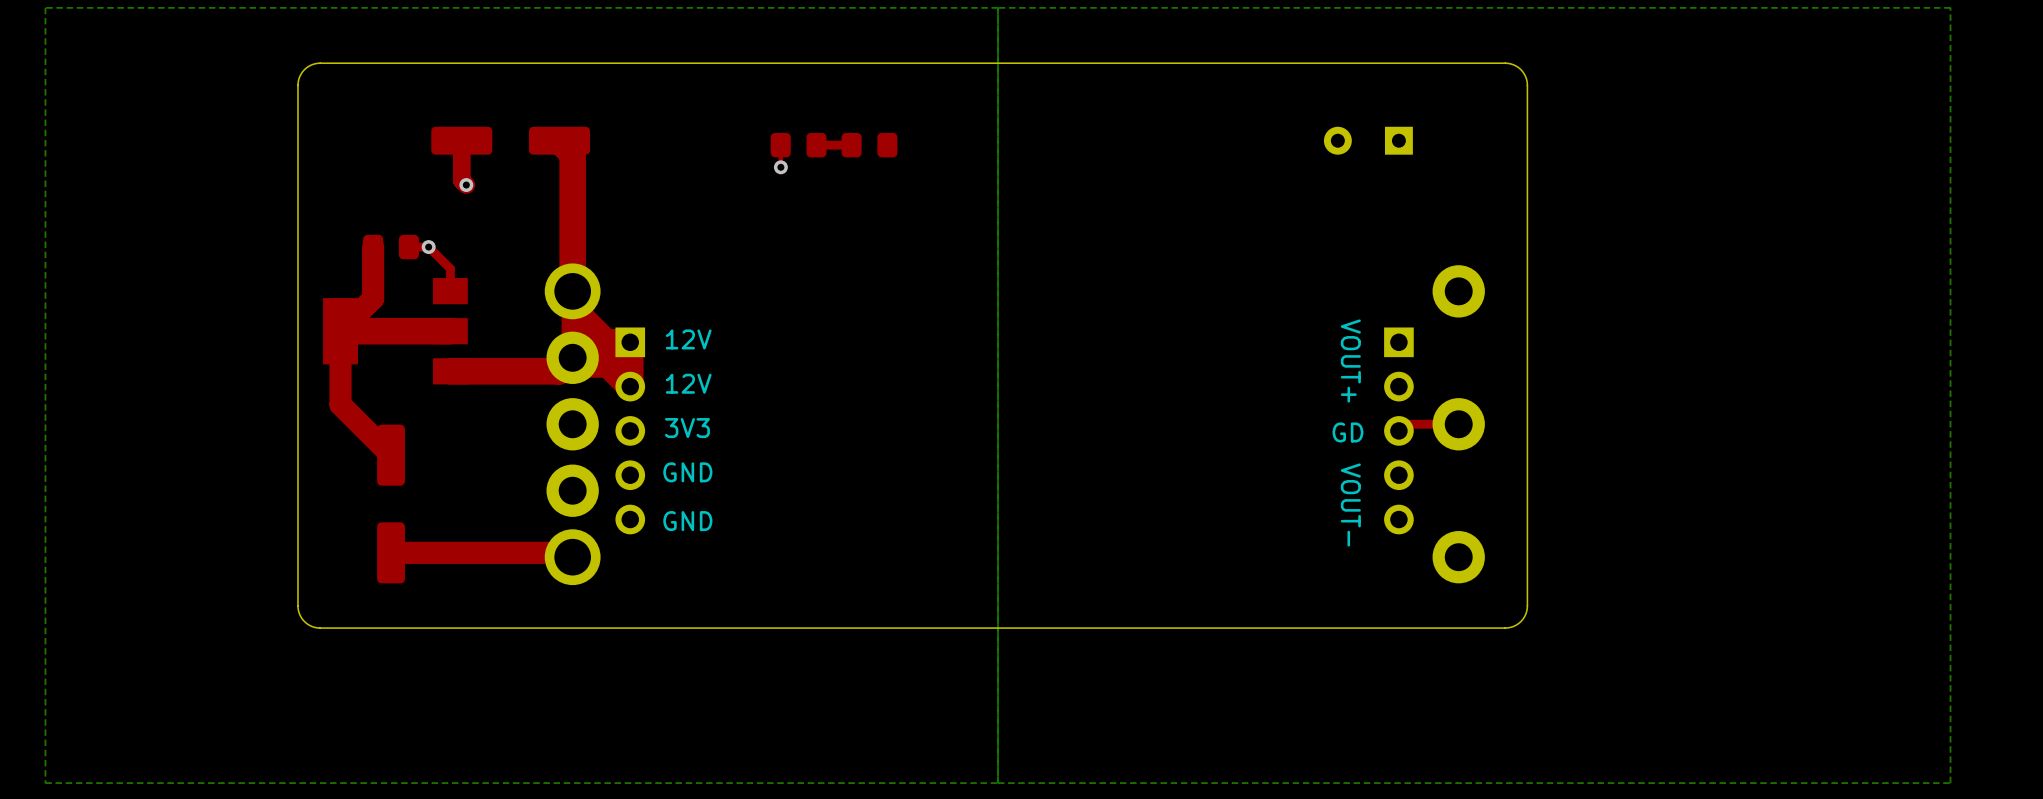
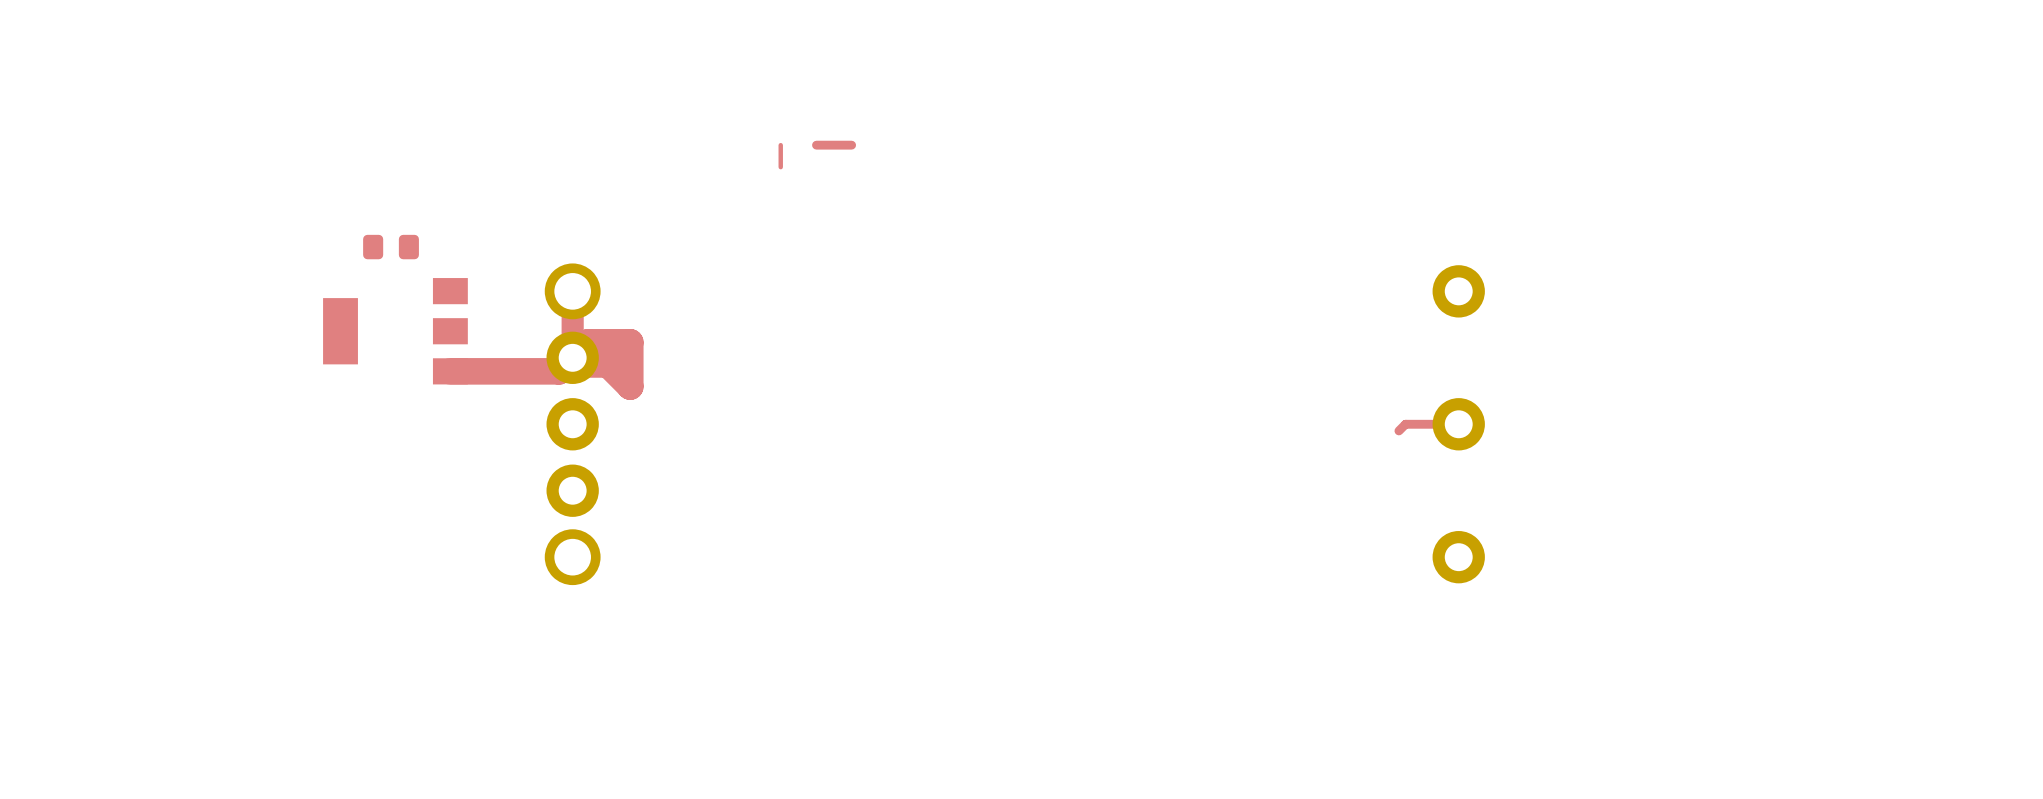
bottom zone outline: (997, 7) (997, 783) -> none
bottom zone outline: (1950, 7) (1950, 783) (45, 783) (45, 7) (1950, 7) -> none
board edge: (1505, 63) (320, 63) (311, 64) (302, 71) (297, 85) (297, 605) (299, 614) (306, 623) (320, 628) (1505, 628) (1513, 626) (1524, 616) (1527, 605) (1527, 85) (1525, 76) (1520, 69) (1513, 64) (1505, 63) -> none
top track: (461, 140) (461, 180) (466, 185) -> none
part: (510, 140) -> none
top track: (559, 140) (572, 153) (572, 309) (605, 342) -> none
part: (1368, 140) -> none
part: (798, 145) -> none
part: (869, 145) -> none
via: (780, 167) -> none
via: (466, 185) -> none
top track: (373, 247) (373, 298) (340, 331) -> none
top track: (408, 247) (428, 247) (450, 268) (450, 291) -> none
via: (428, 247) -> none
top track: (340, 331) (340, 404) (391, 455) -> none
top track: (450, 331) (340, 331) -> none
part: (630, 430) -> none
part: (1398, 430) -> none
part: (391, 504) -> none
top track: (391, 552) (568, 552) (572, 557) -> none

